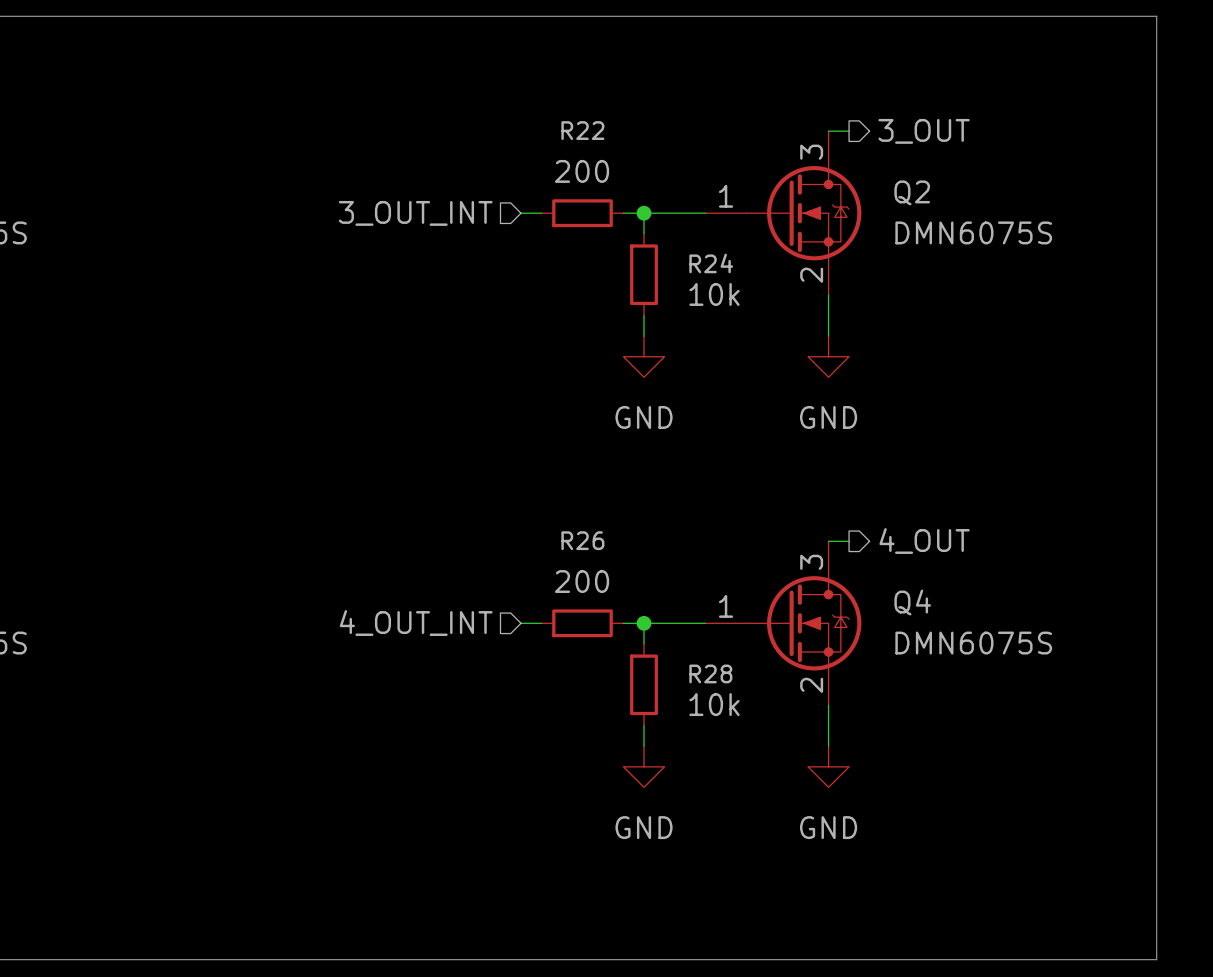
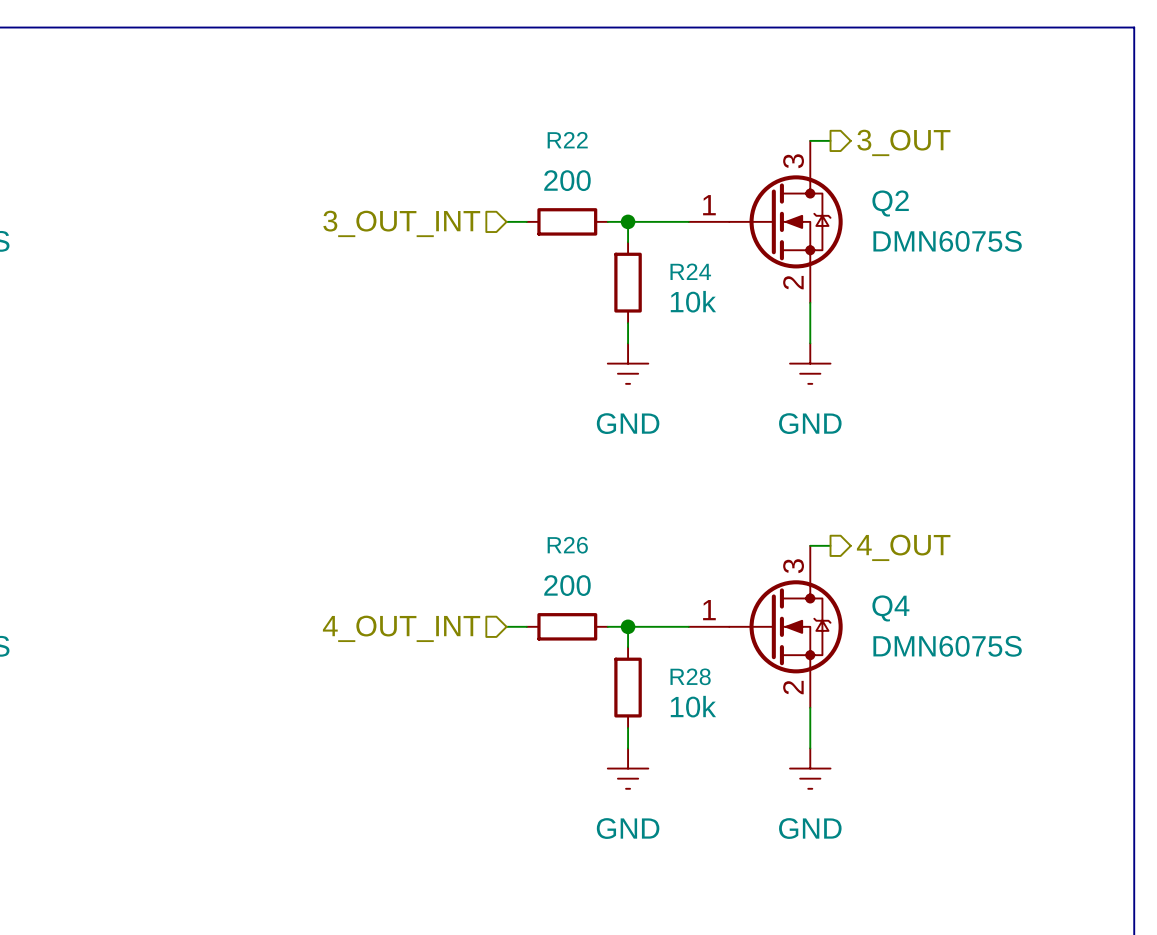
power symbol shape: [623, 336, 665, 378] -> [607, 343, 649, 384]
power symbol shape: [808, 336, 850, 378] -> [790, 343, 831, 384]
power symbol shape: [623, 746, 665, 788] -> [607, 748, 649, 789]
power symbol shape: [808, 746, 850, 788] -> [790, 748, 831, 789]

